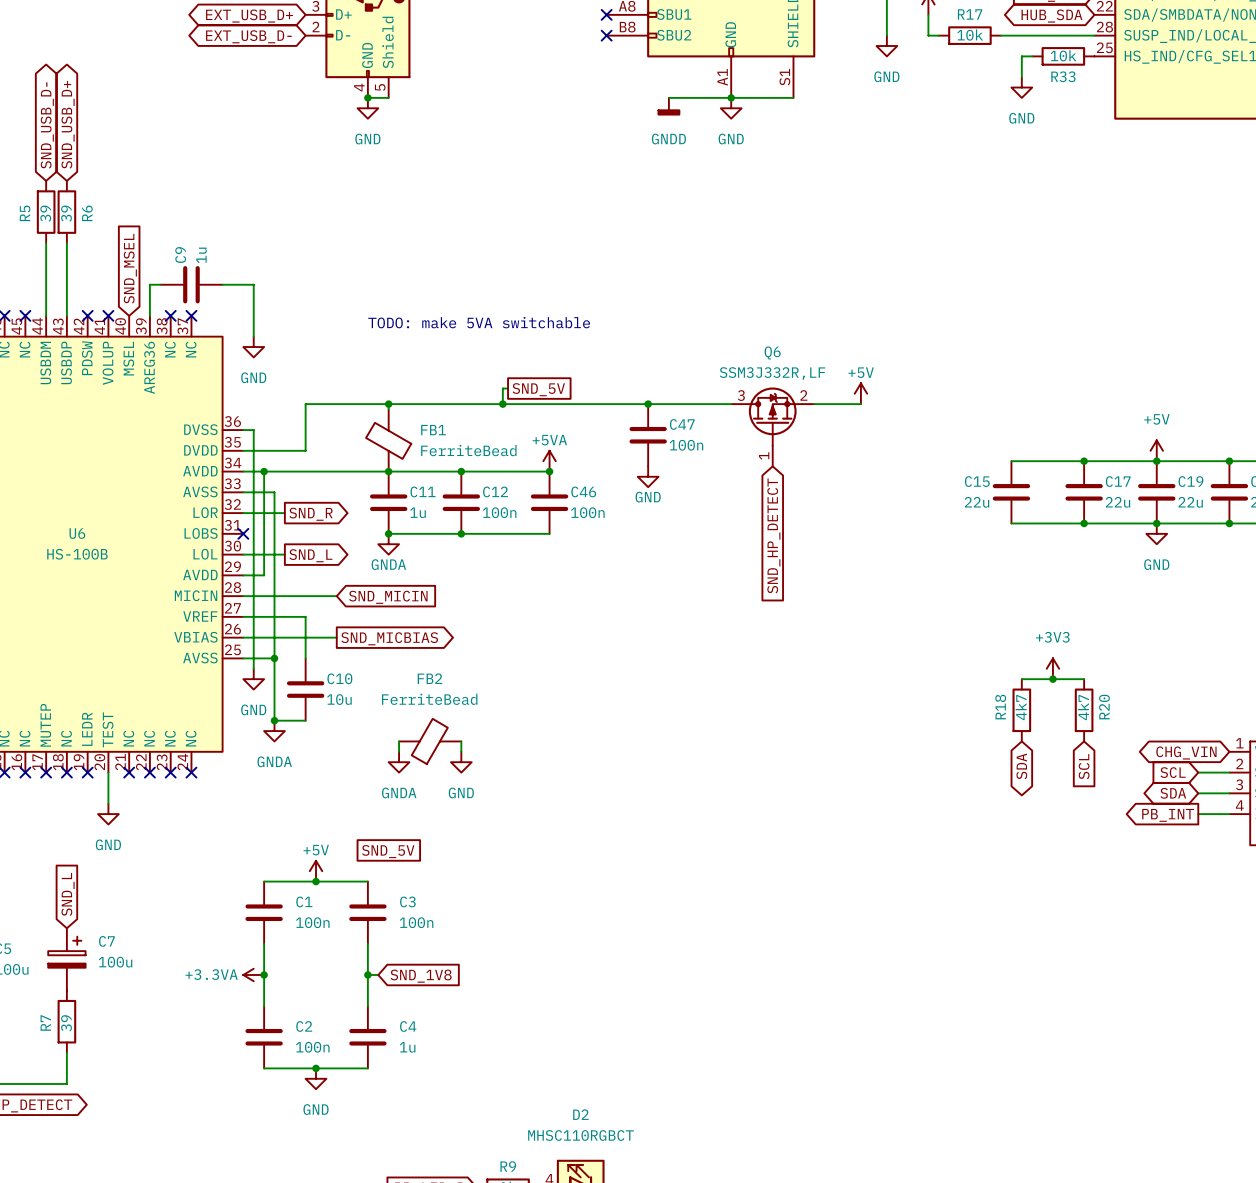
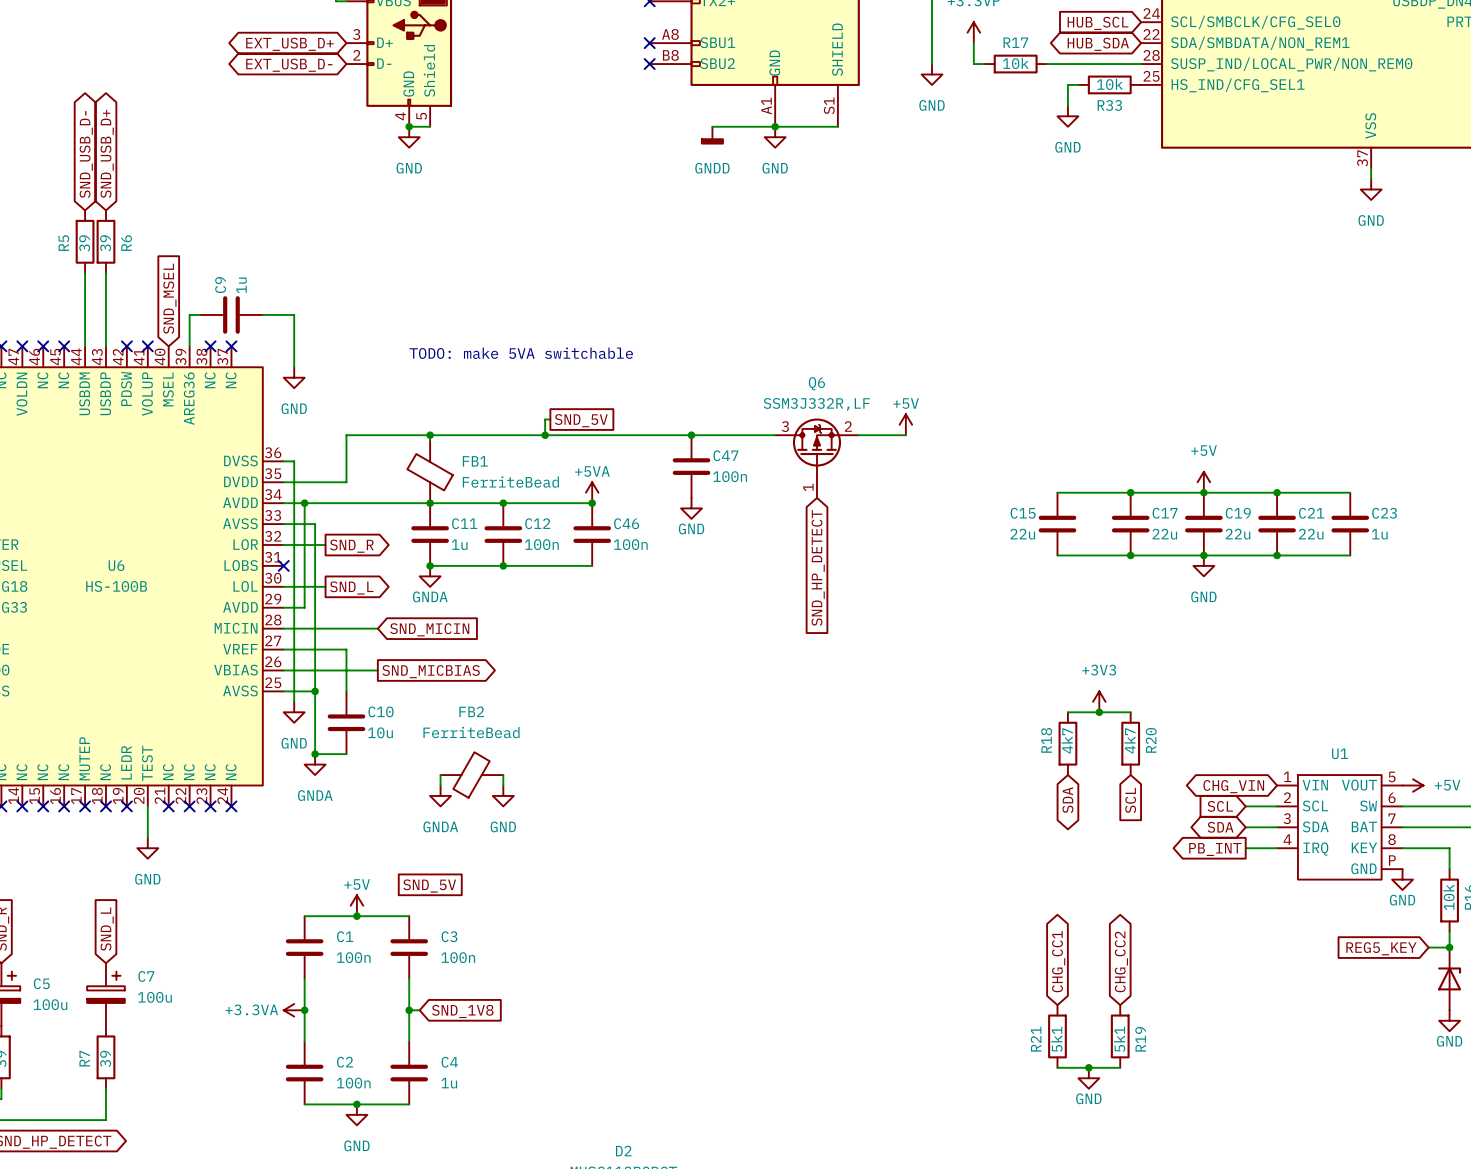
global label: none -> CHG_CC1 (1058, 961)
global label: none -> CHG_CC2 (1121, 961)
R21: none -> 5k1 (1057, 1036)
R19: none -> 5k1 (1120, 1036)
wire: none -> (1057, 1067) (1120, 1067)
junction: none -> (1088, 1067)
power symbol: none -> GND (1088, 1078)

